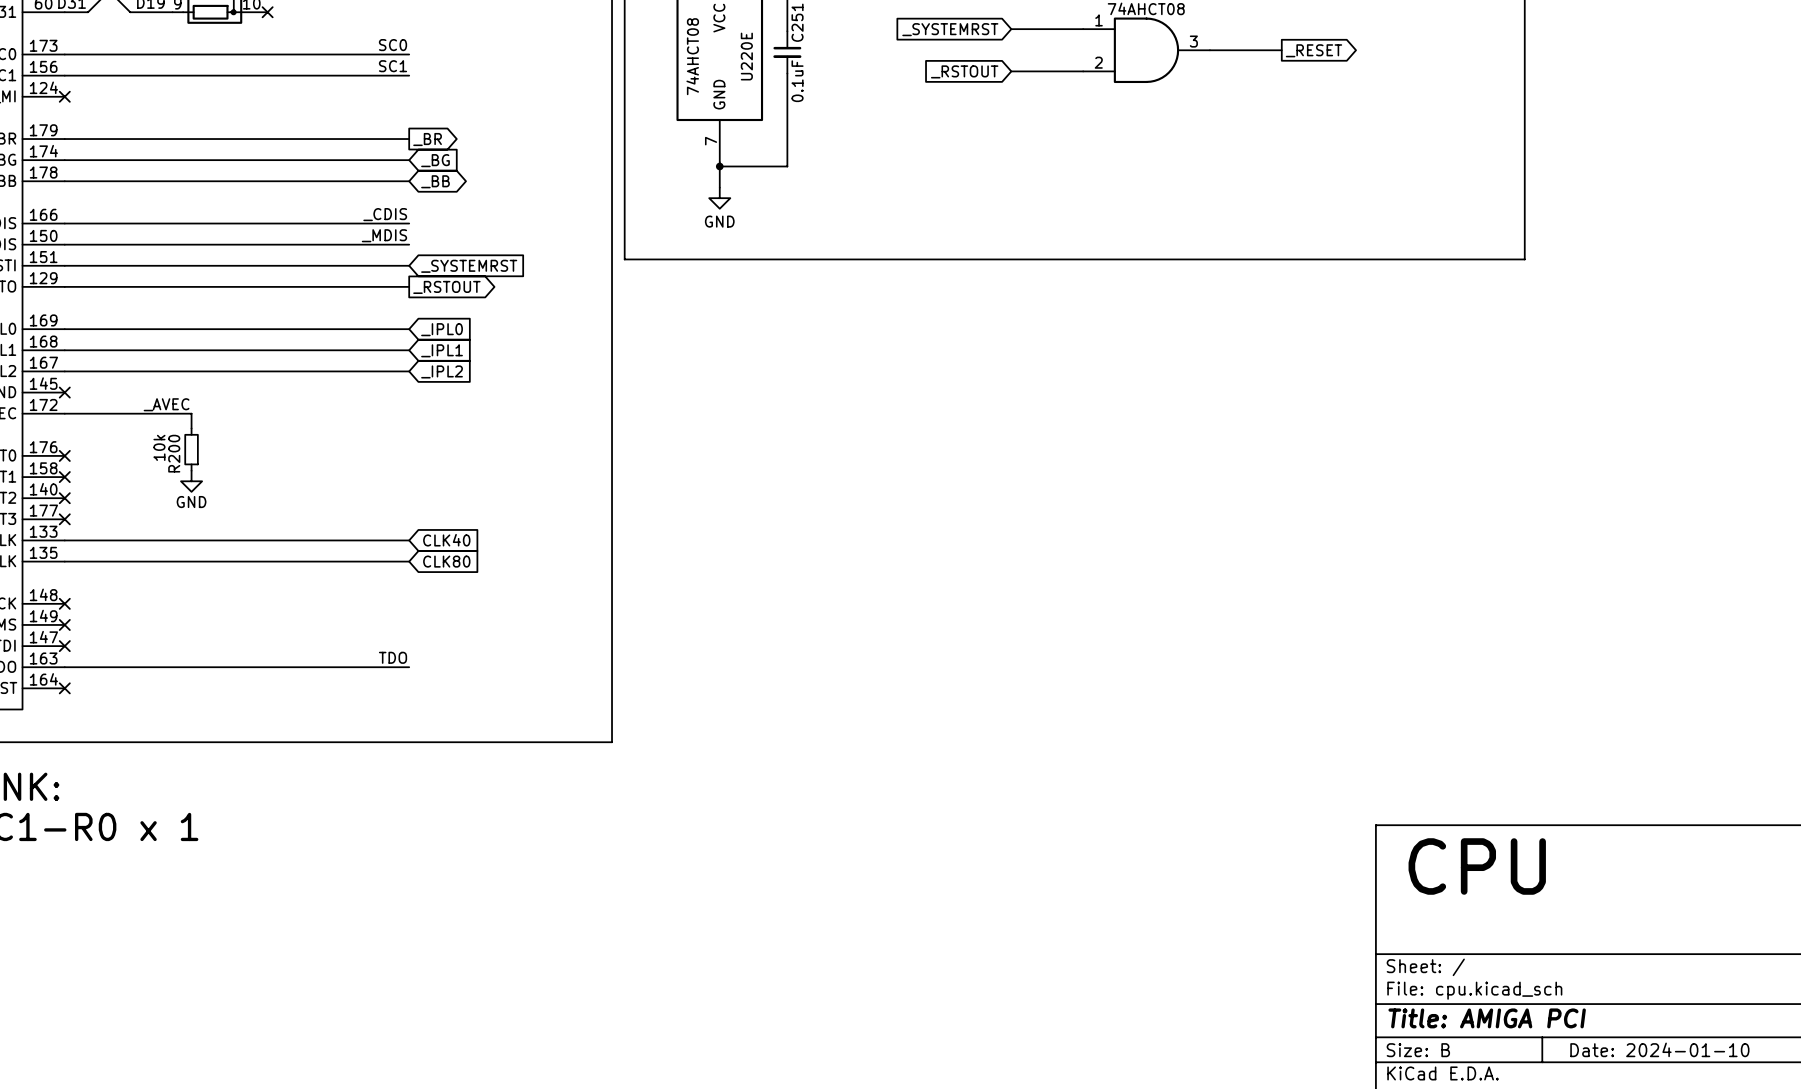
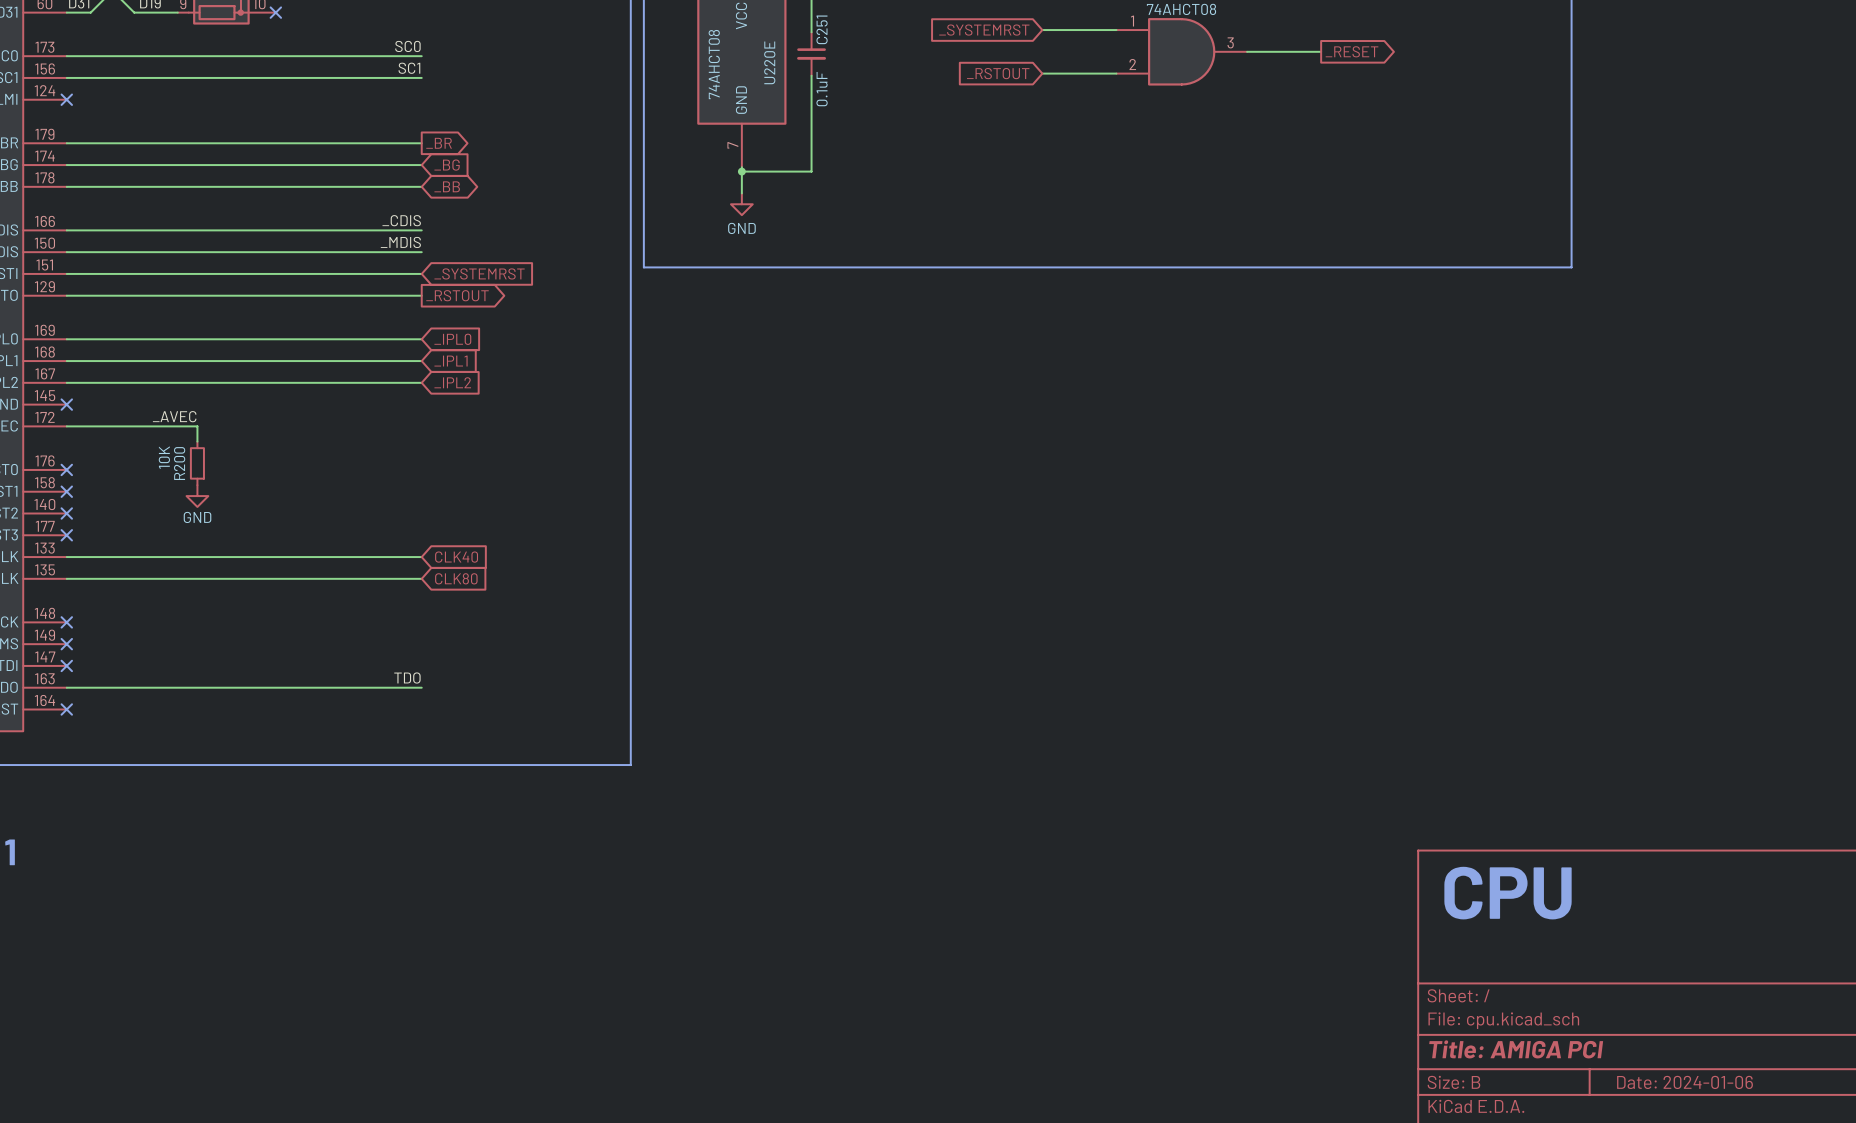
R200 value: 10k (159, 447) -> 10K (164, 457)
title block: Date: 2024-01-10 (1659, 1049) -> Date: 2024-01-06 (1685, 1082)

